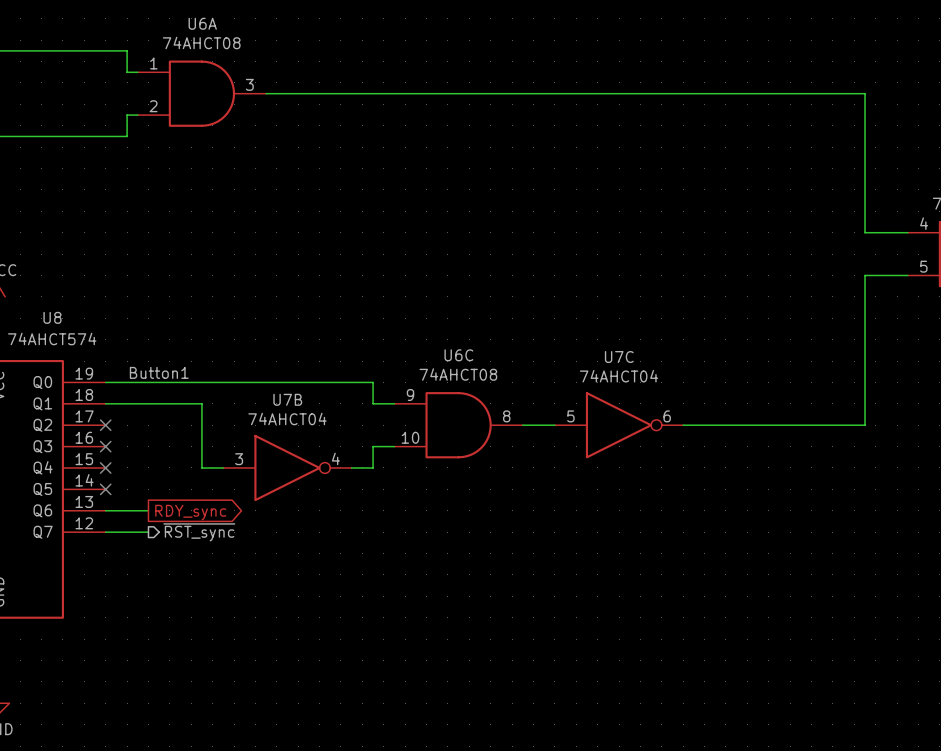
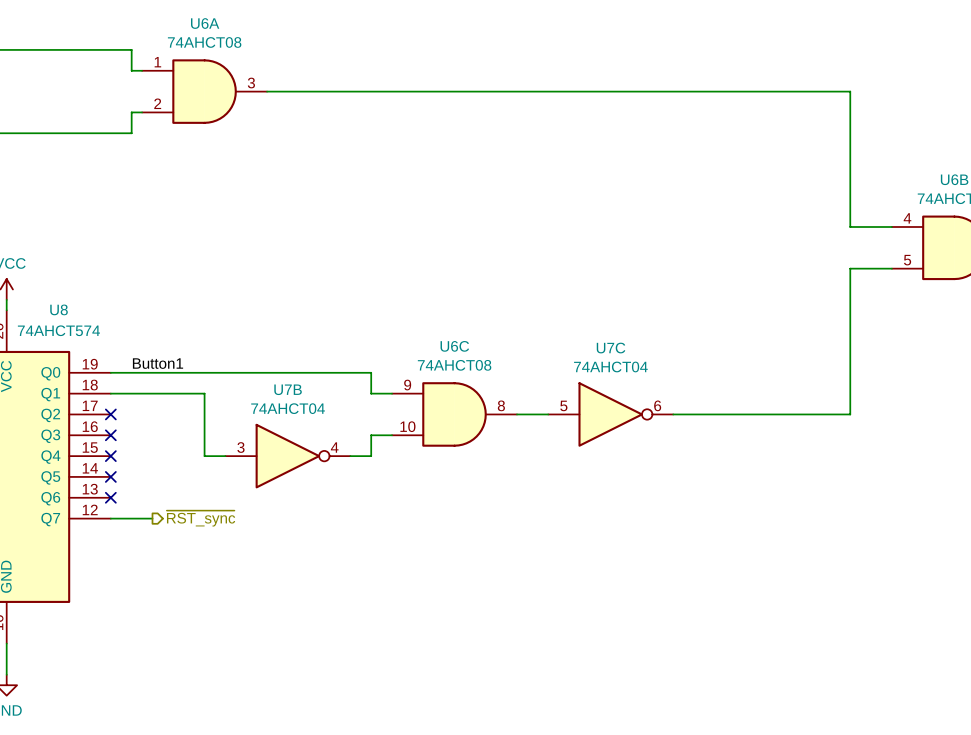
wire: (105, 510) (148, 510) -> none
no-connect mark: none -> (110, 497)
global label: RDY_sync (190, 512) -> none

